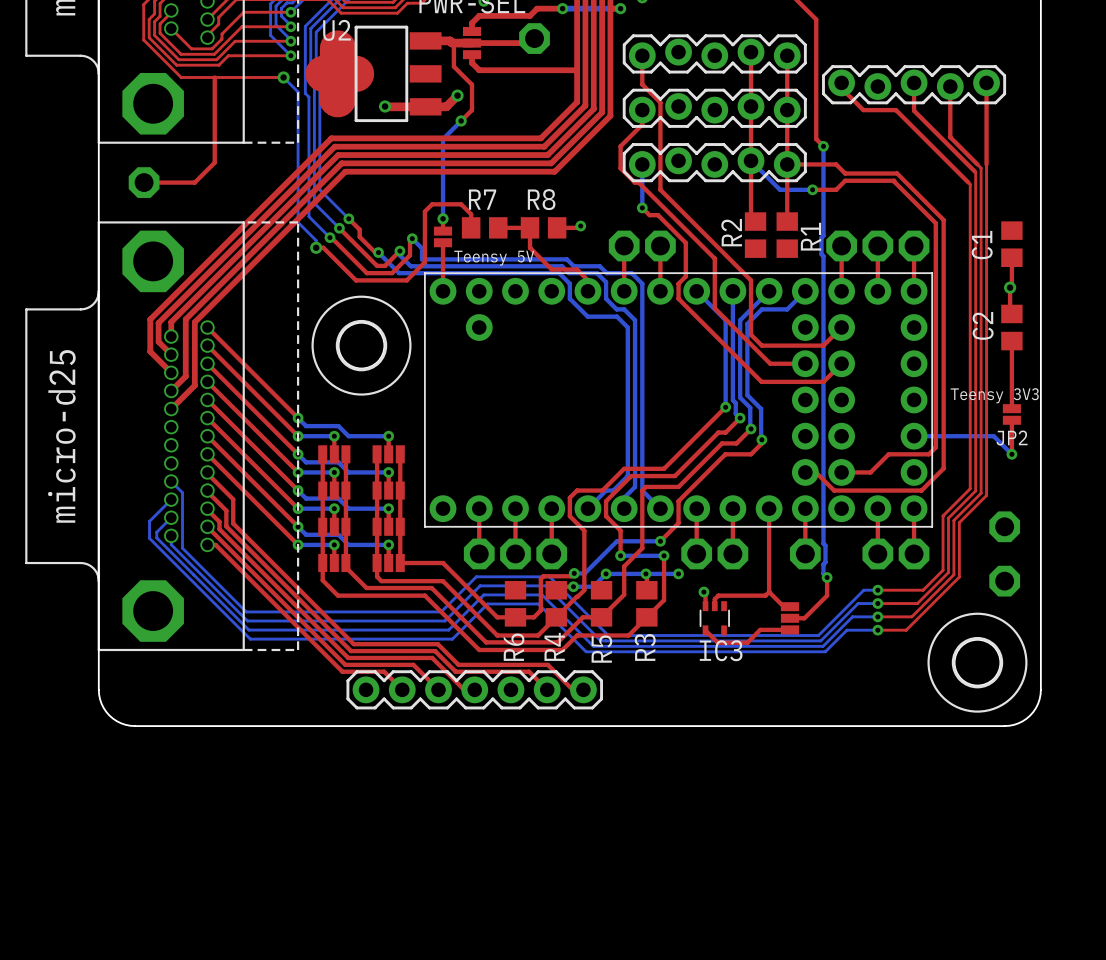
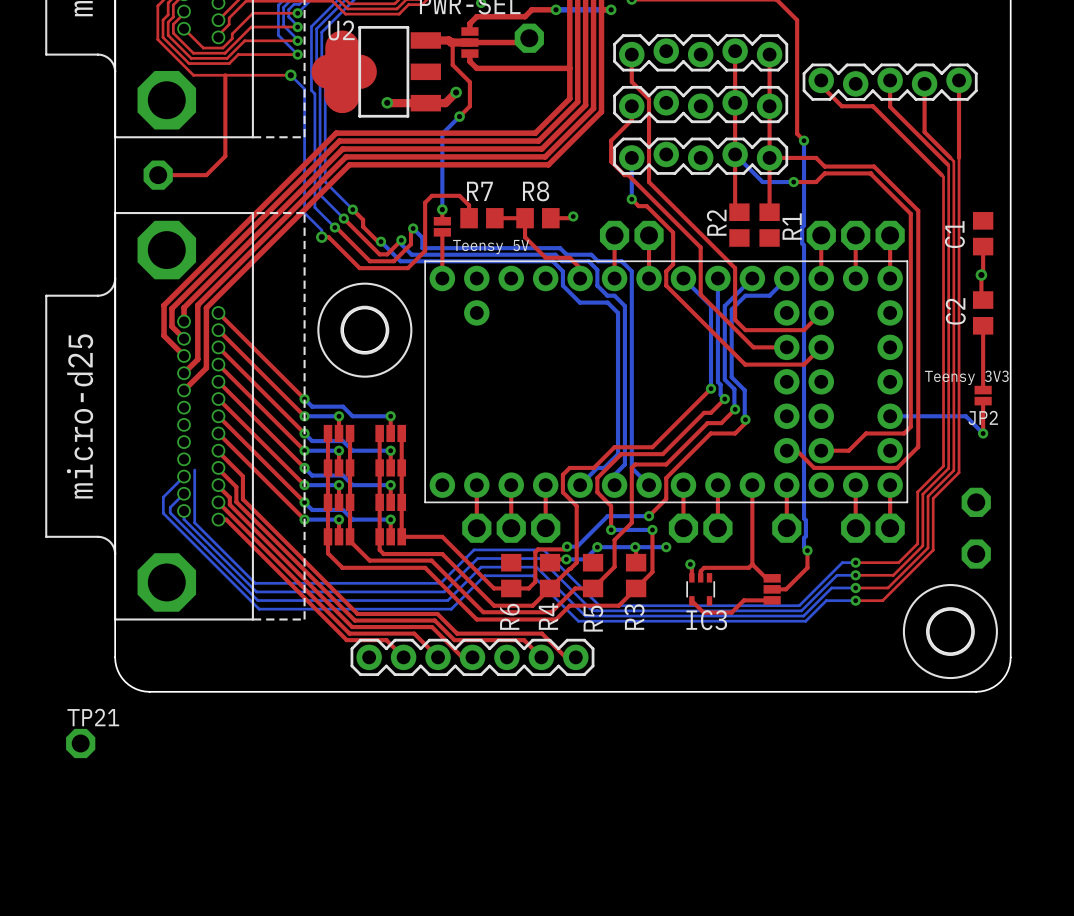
bottom track: (171, 481) (182, 492) -> none
TP21: none -> (80, 743)

